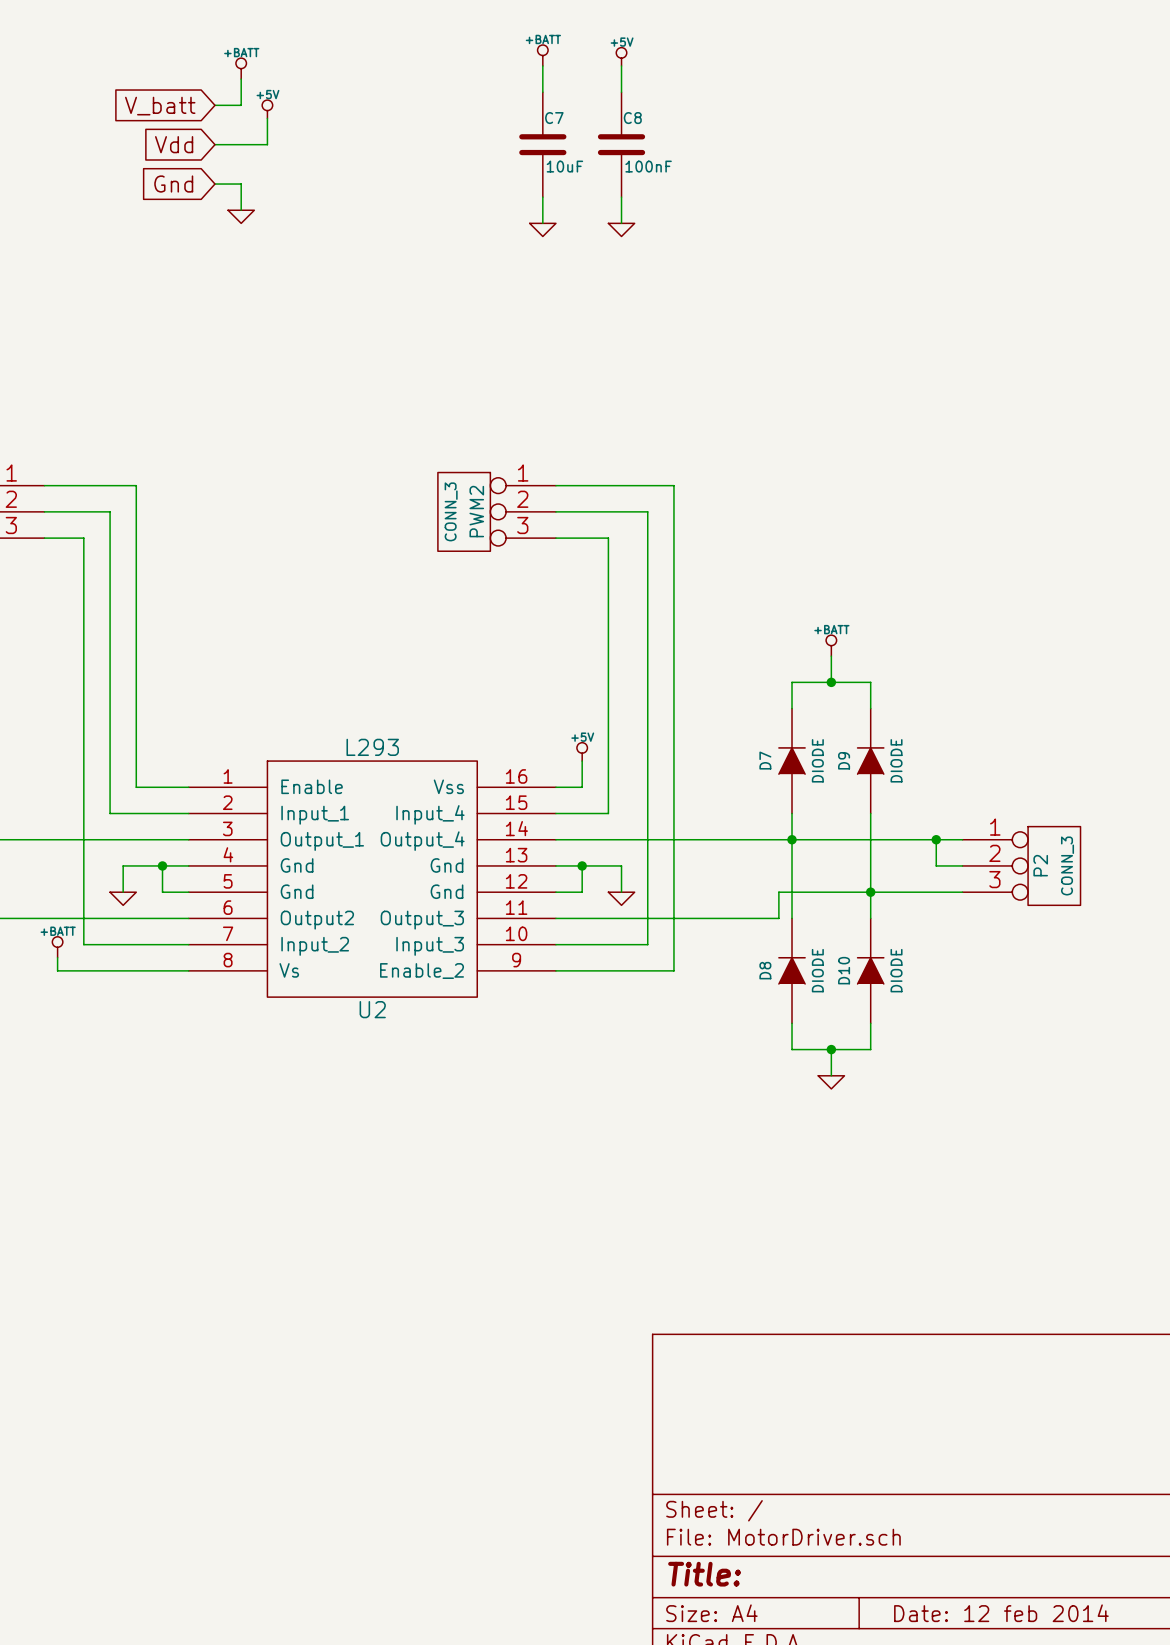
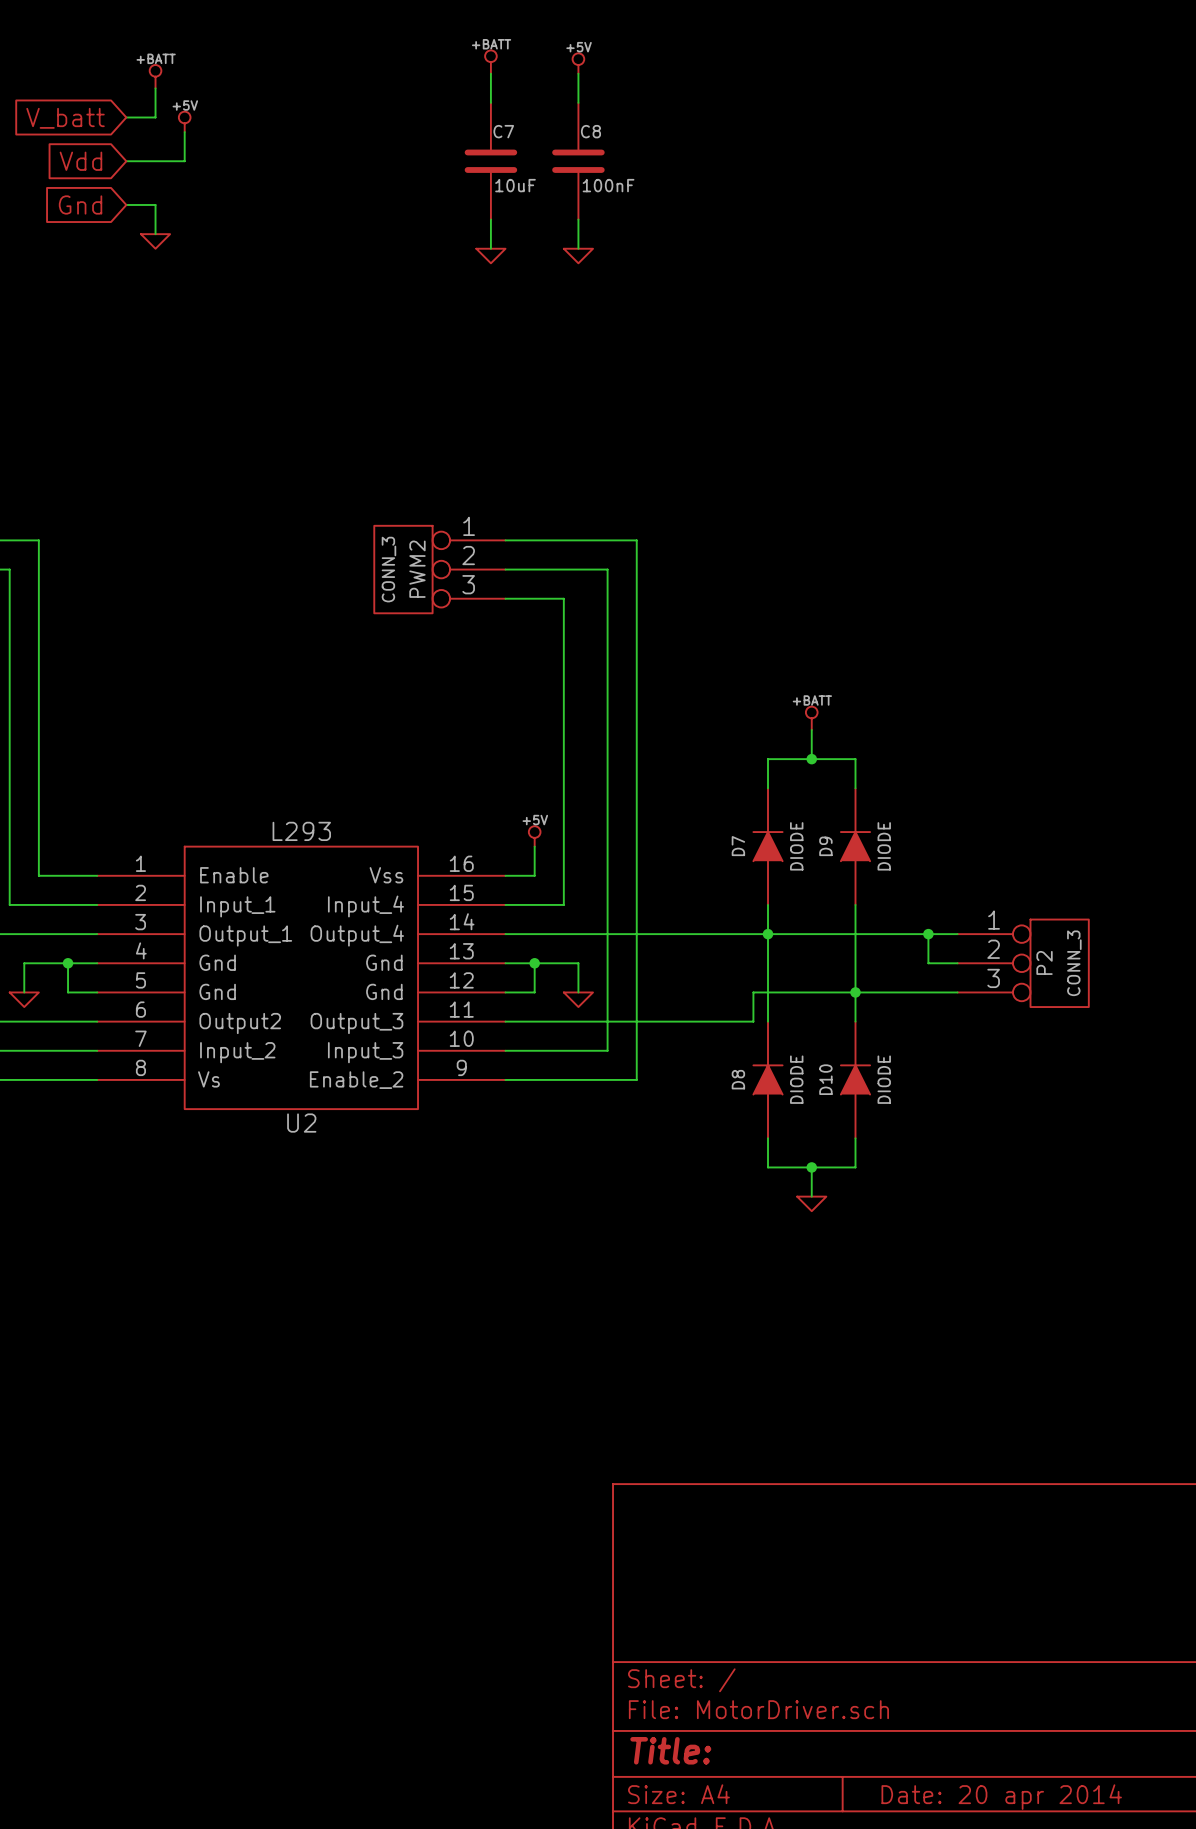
title block: Date: 12 feb 2014 (1001, 1613) -> Date: 20 apr 2014 (1001, 1797)

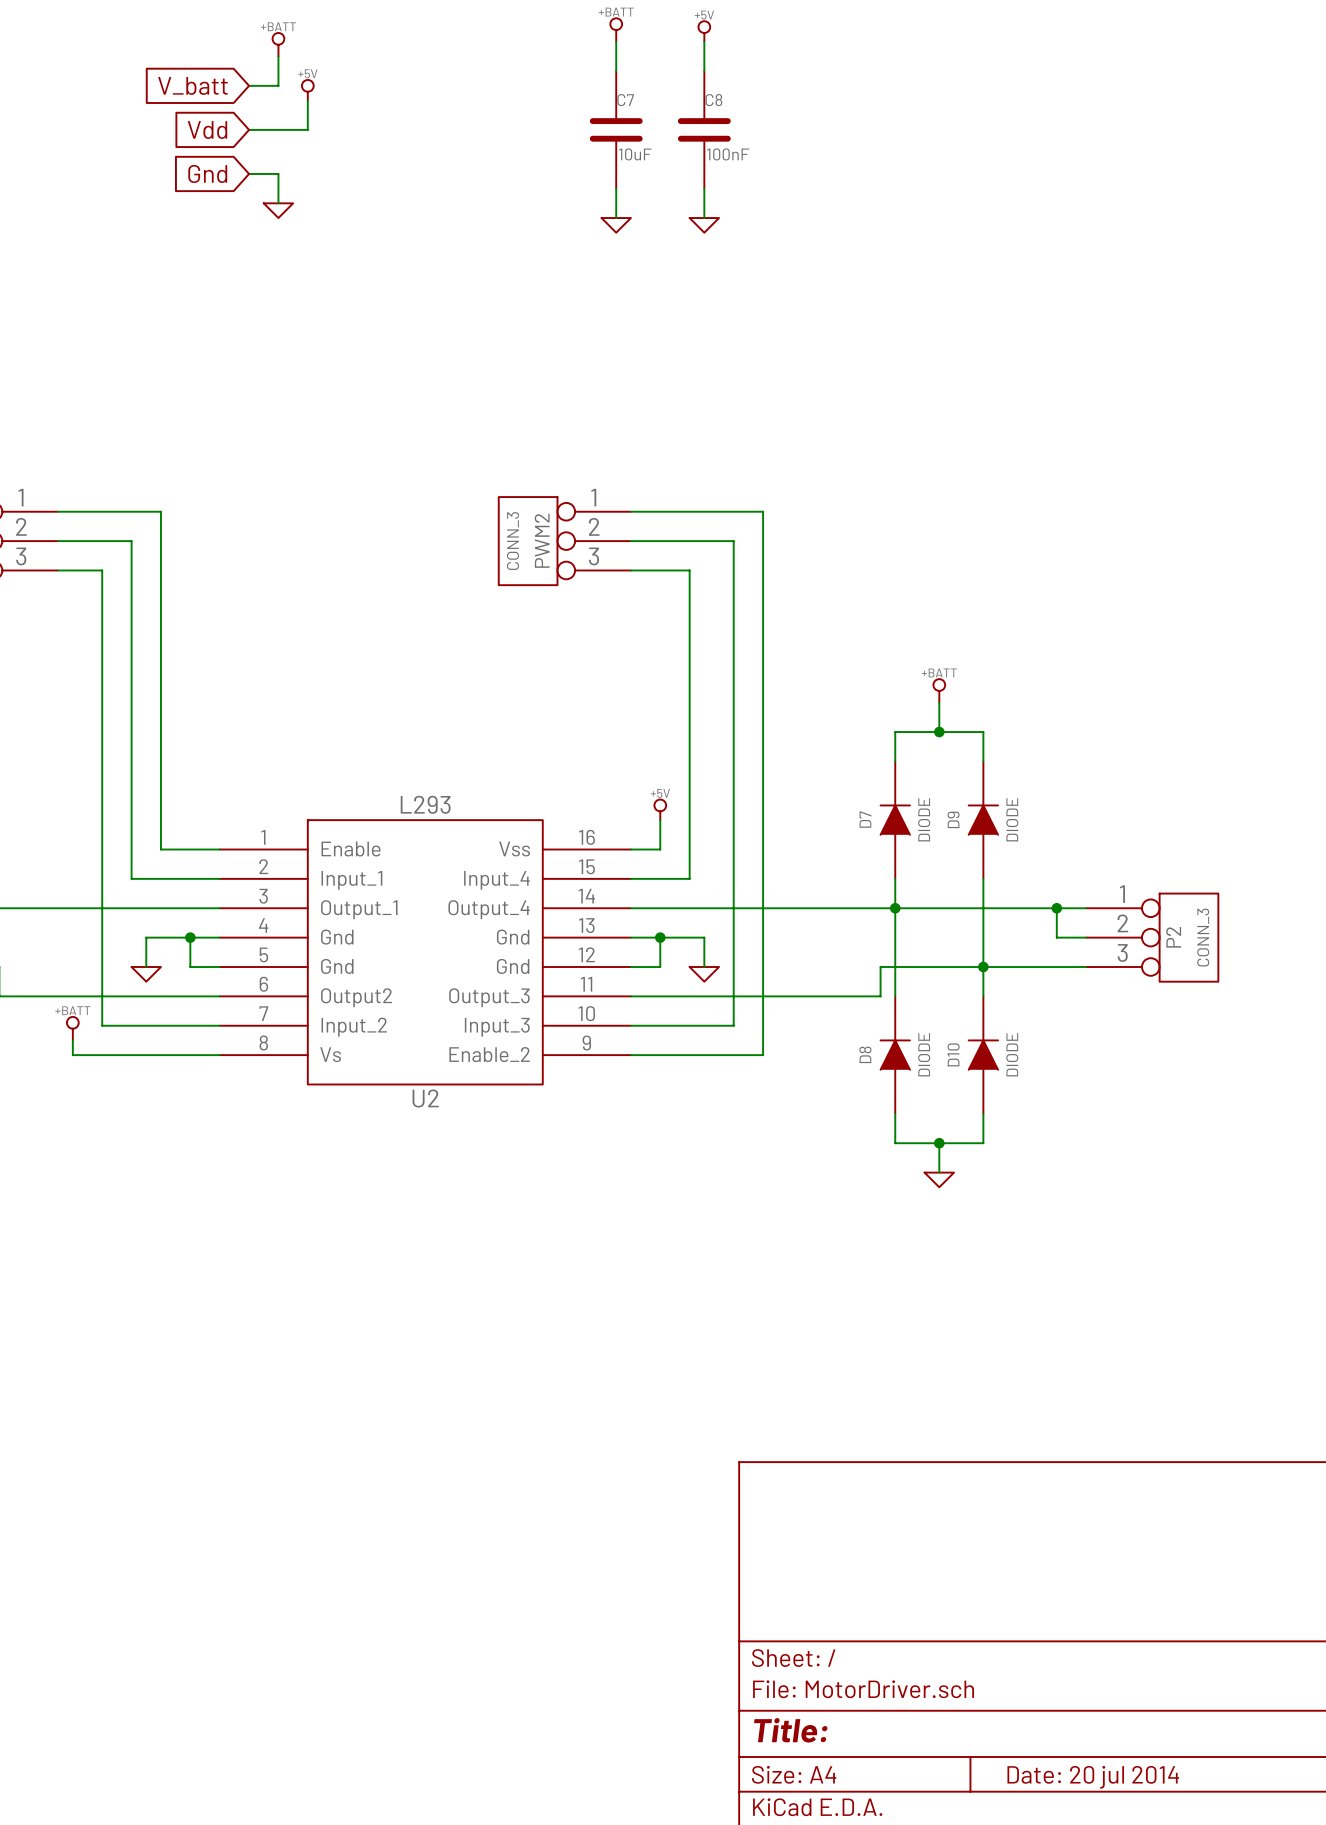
title block: Date: 20 apr 2014 (1001, 1797) -> Date: 20 jul 2014 (1093, 1777)

